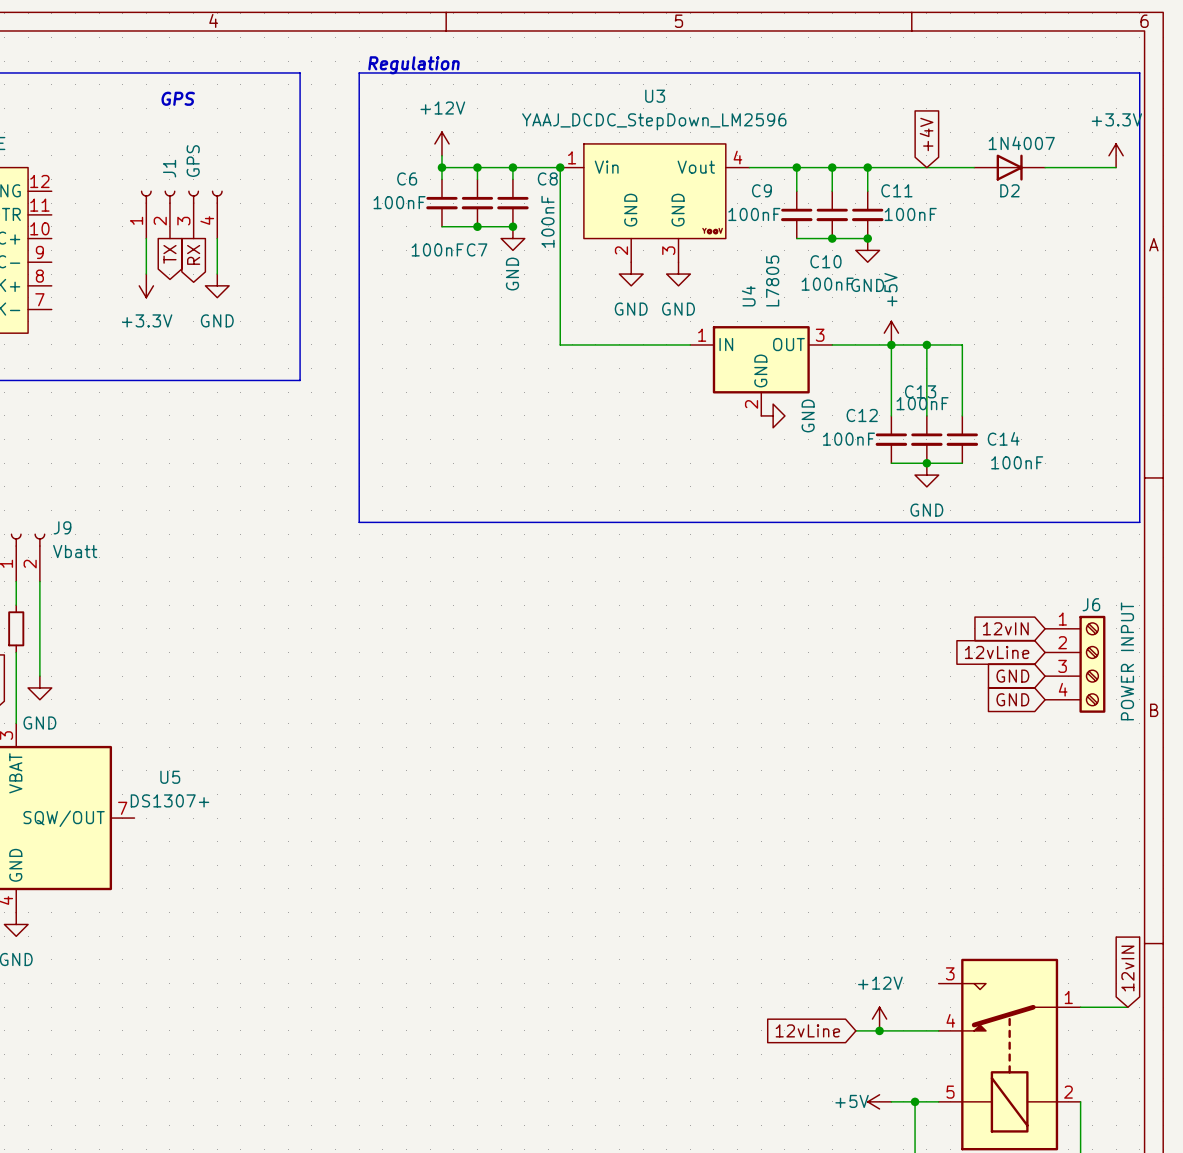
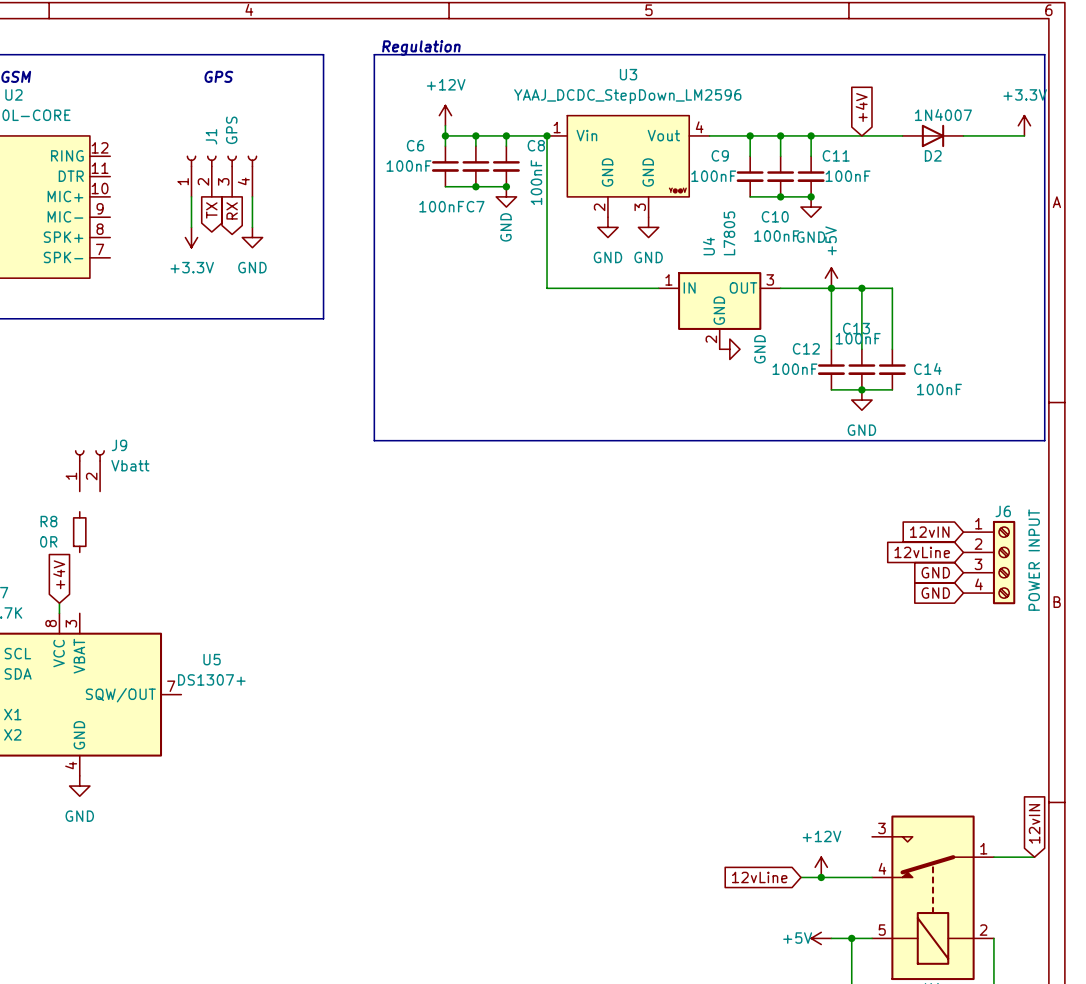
wire: (16, 581) (16, 605) -> none
wire: (39, 581) (39, 676) -> none
wire: (16, 652) (16, 723) -> none
power symbol: GND (39, 687) -> none

